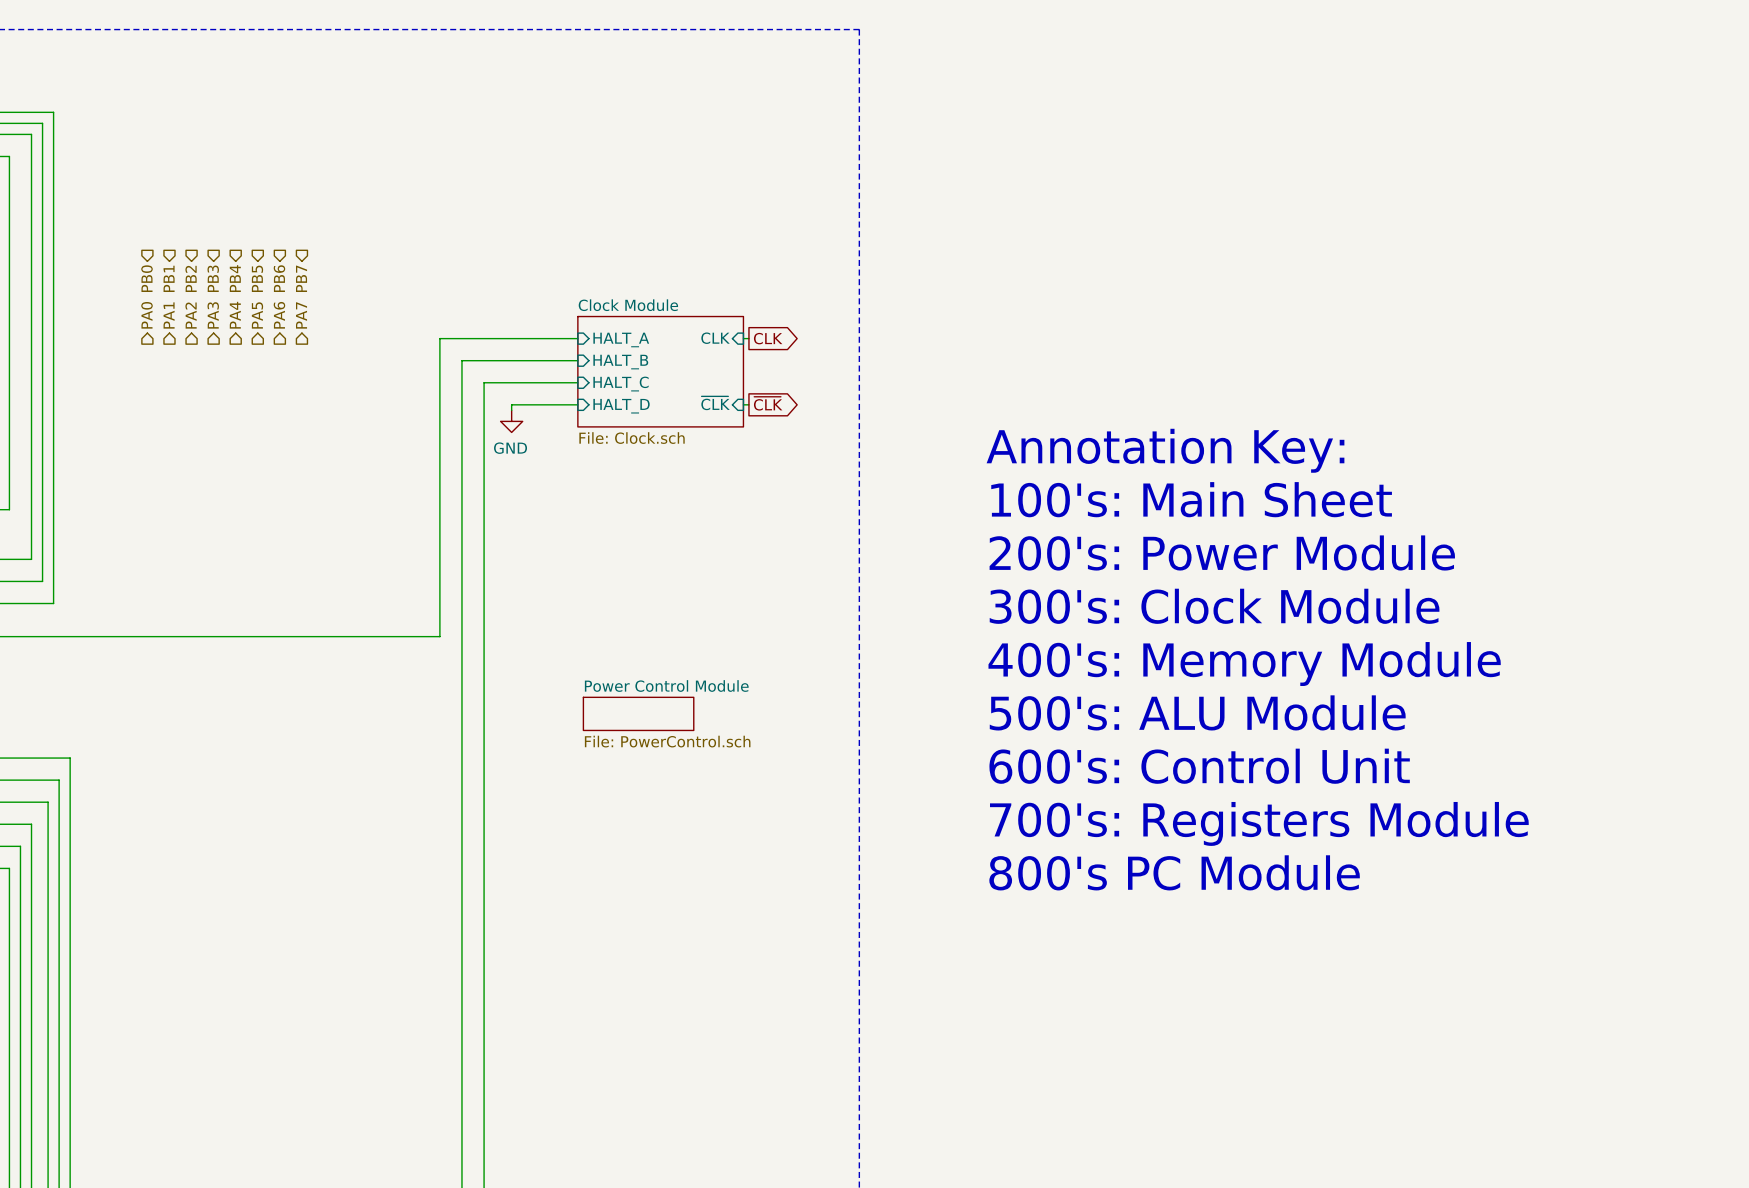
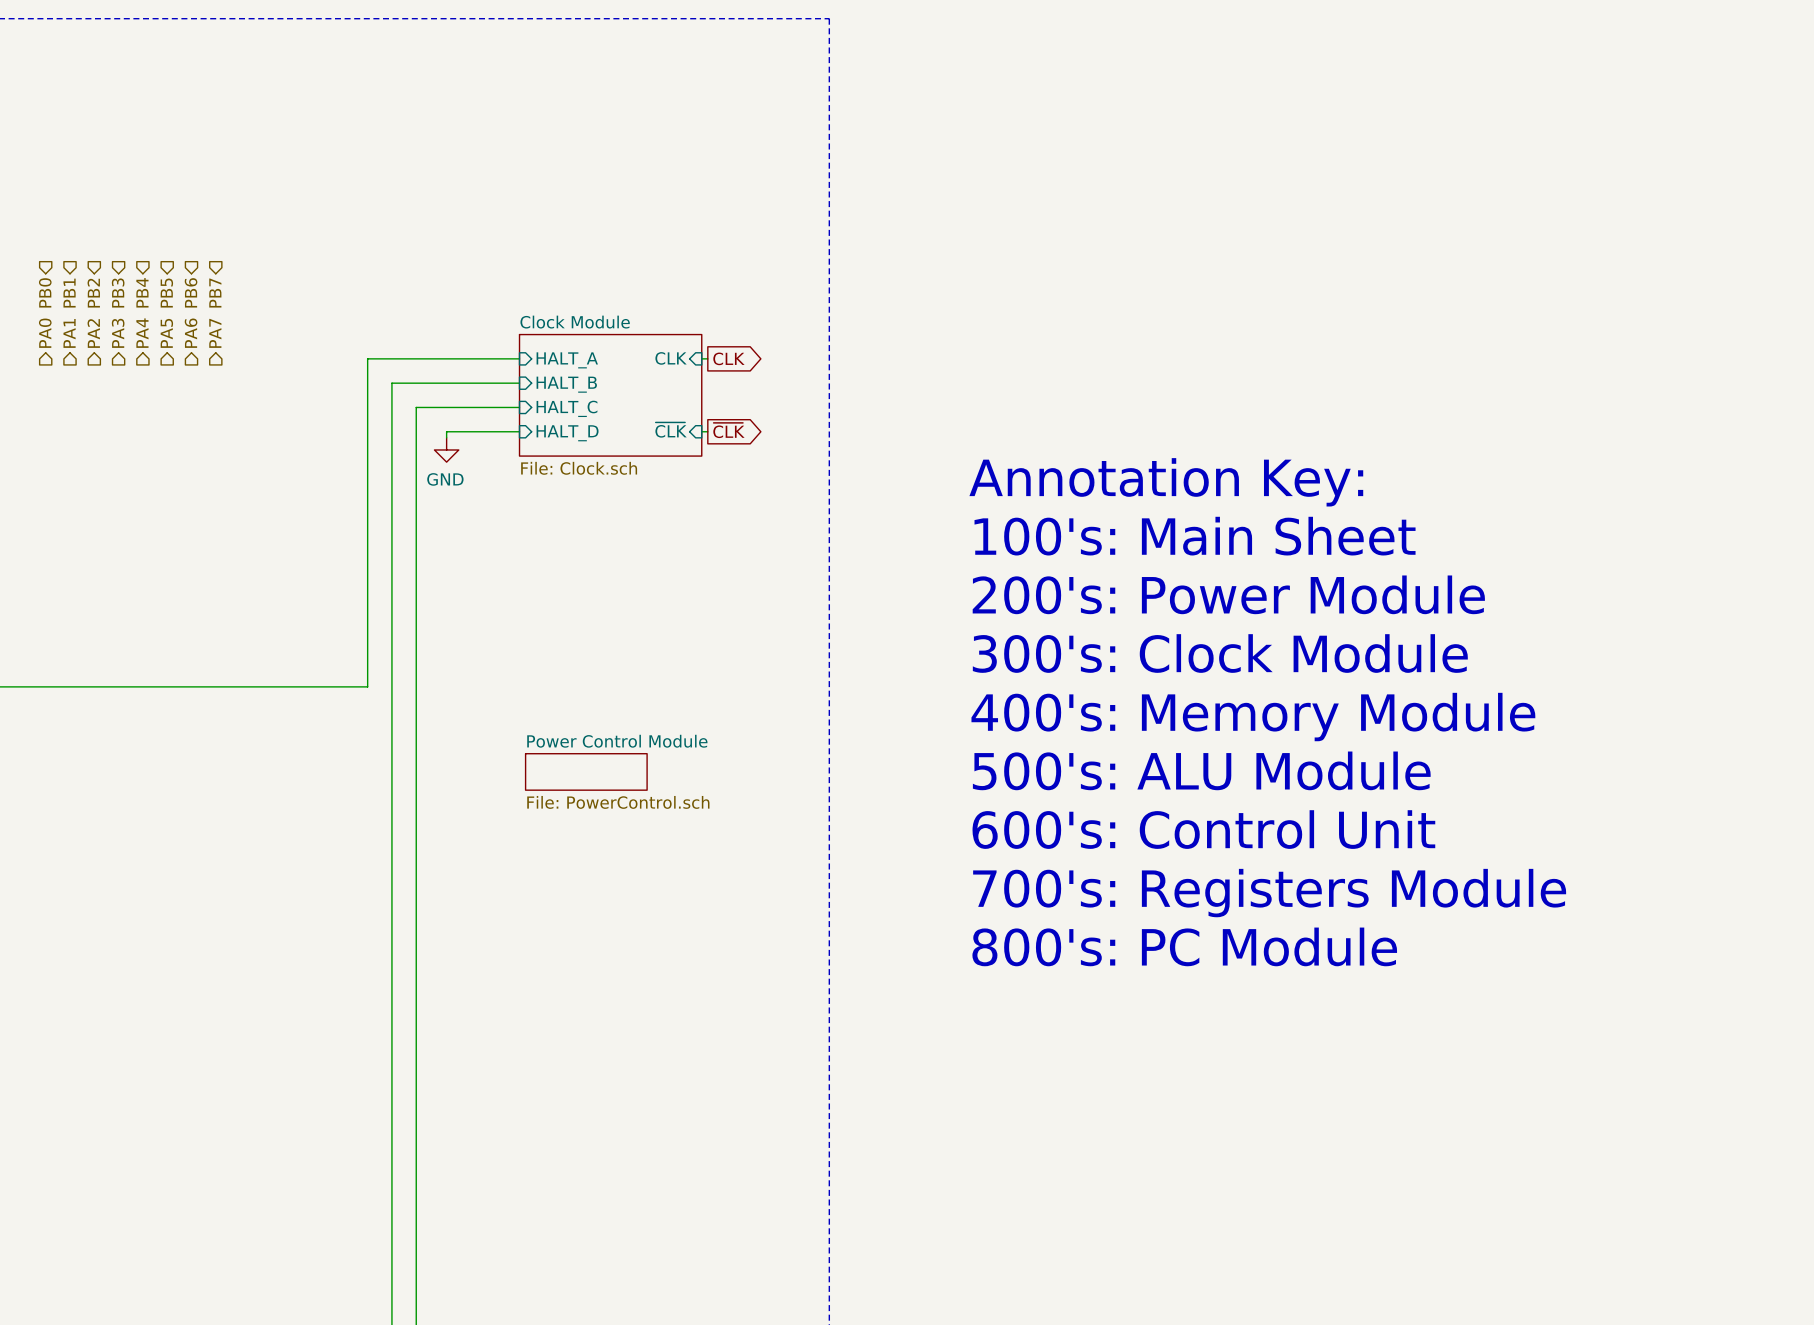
text: 800's PC Module (1174, 872) -> 800's: PC Module (1184, 946)

